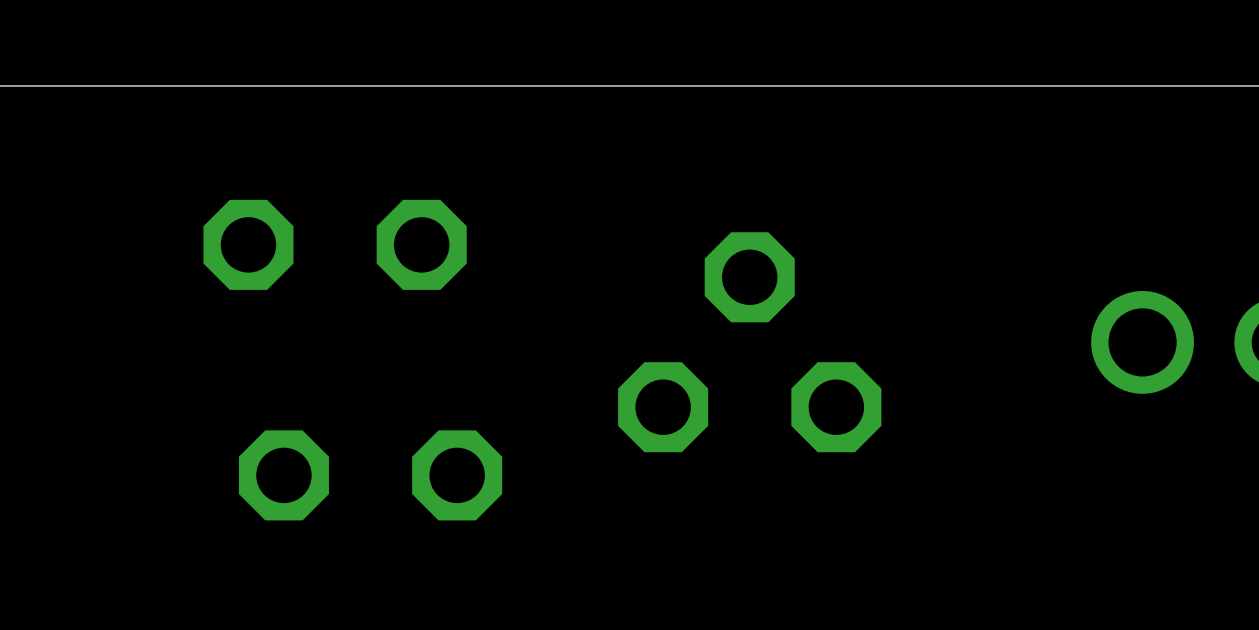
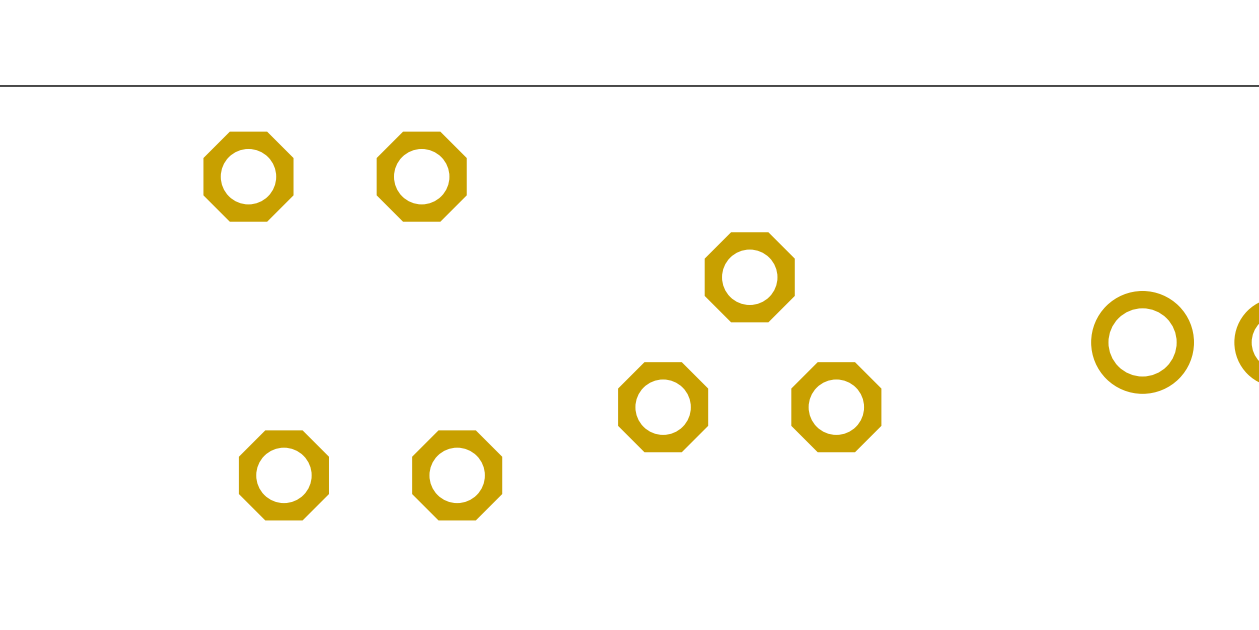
part position: (335, 244) -> (335, 176)

